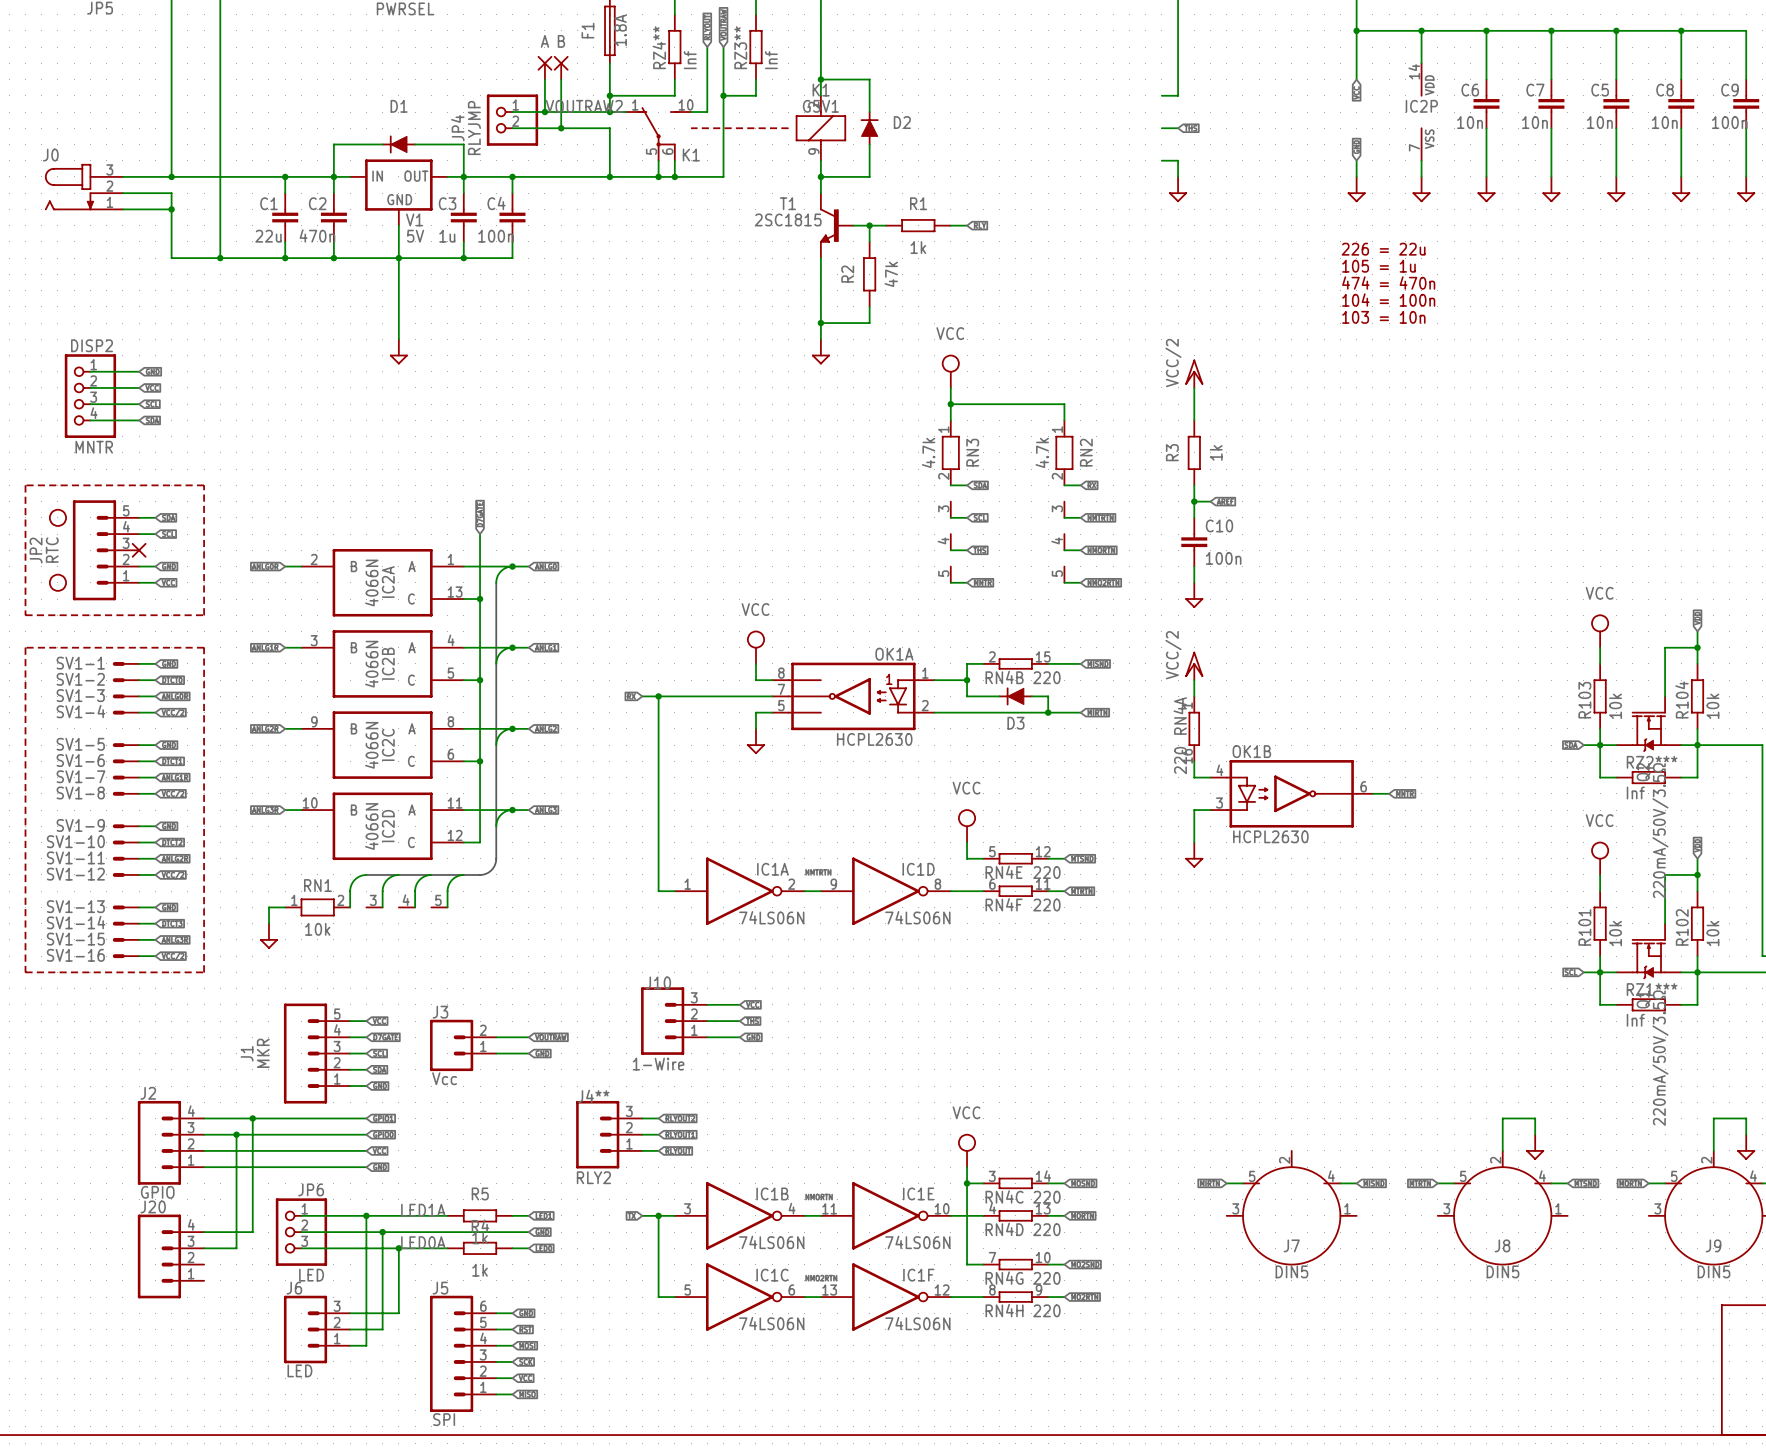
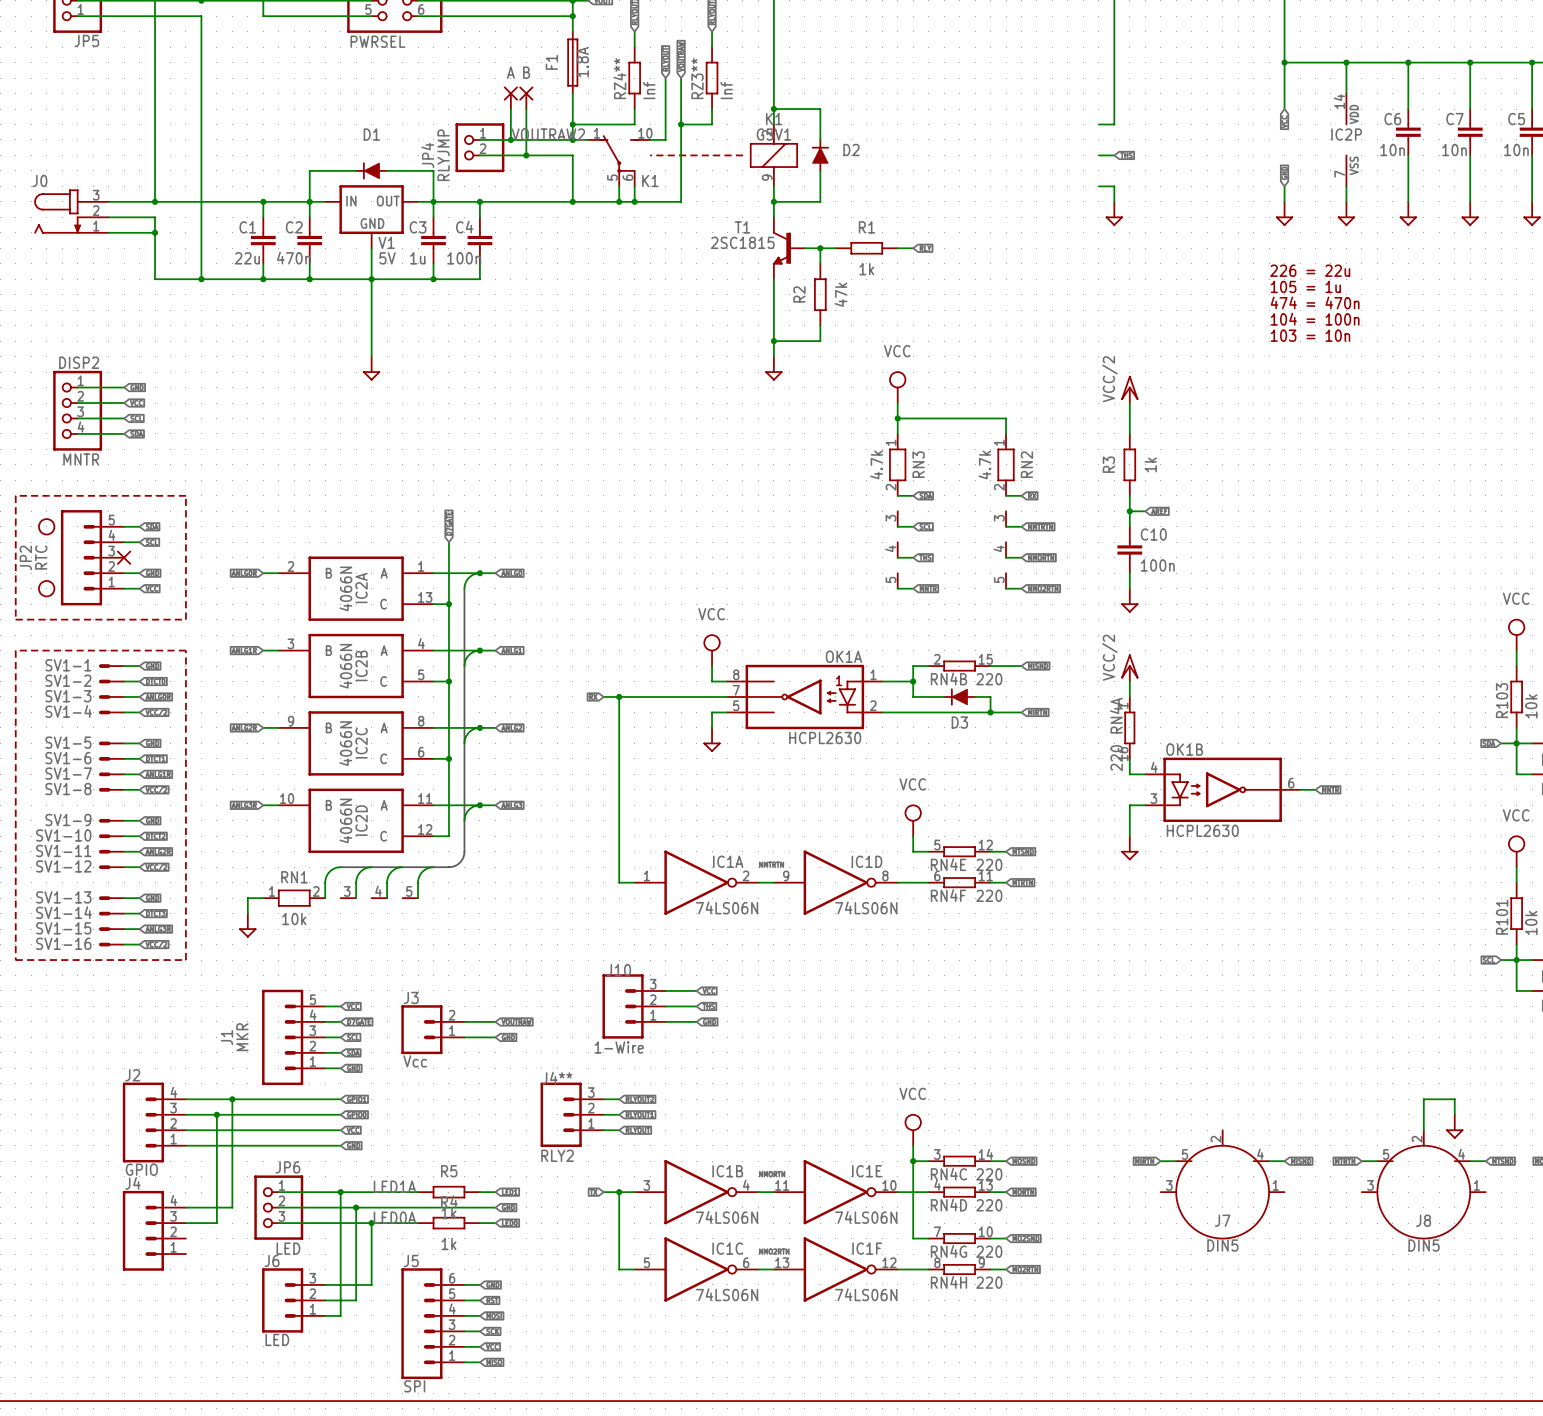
J20 name: J20 (153, 1206) -> J4 (132, 1183)

